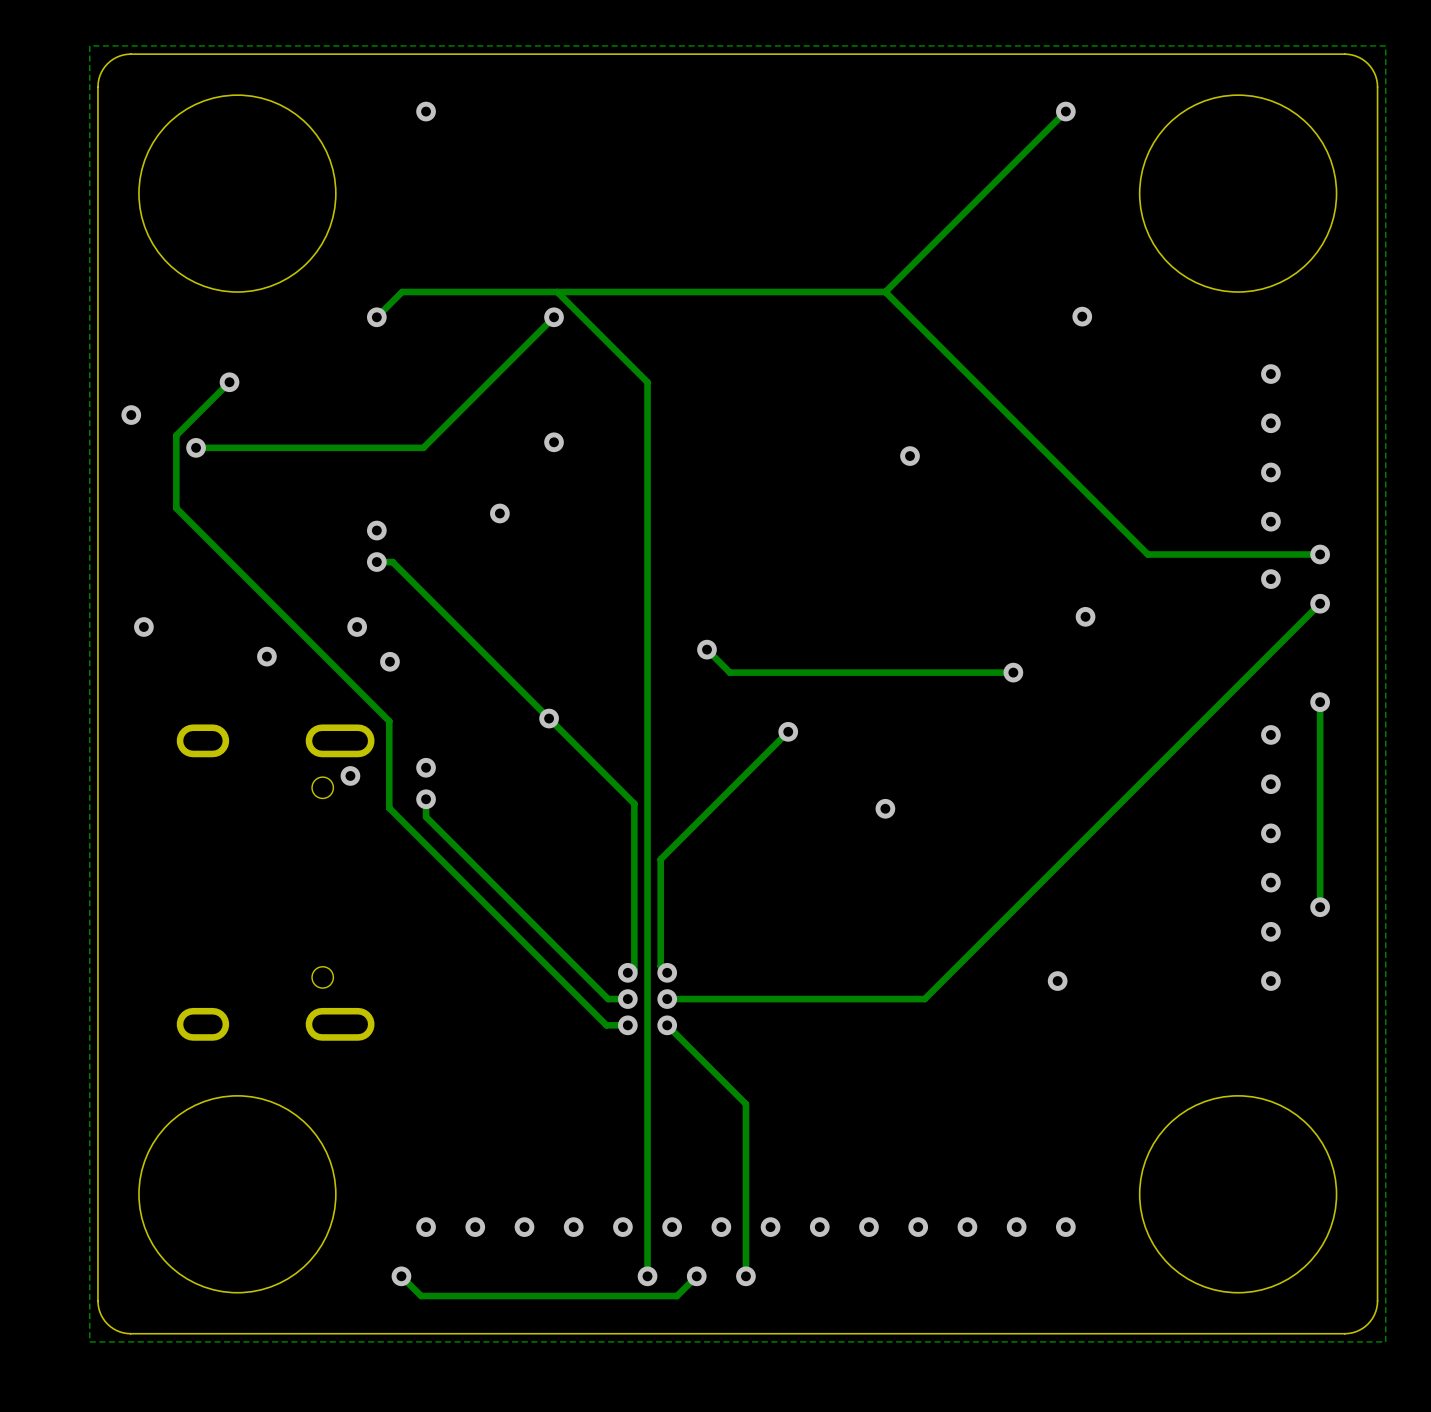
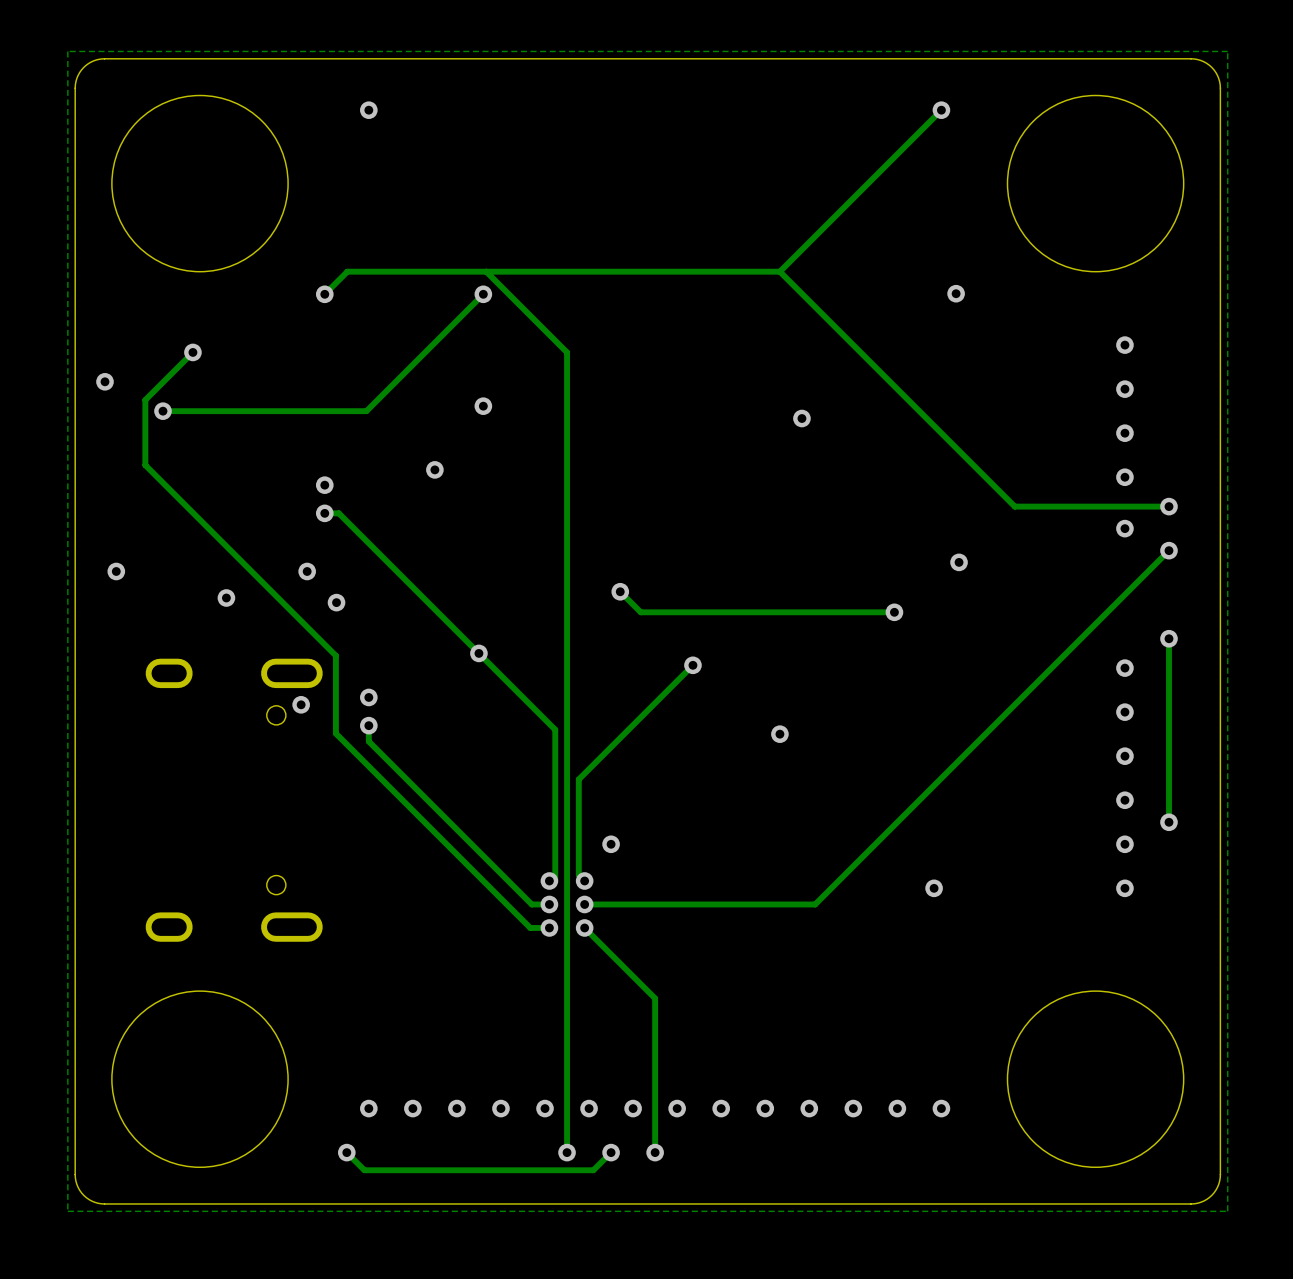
via: none -> (611, 844)

